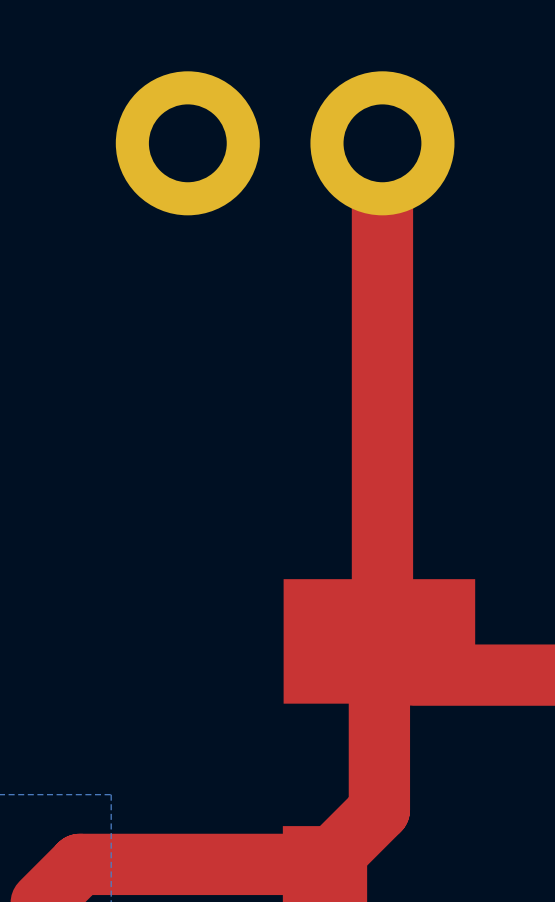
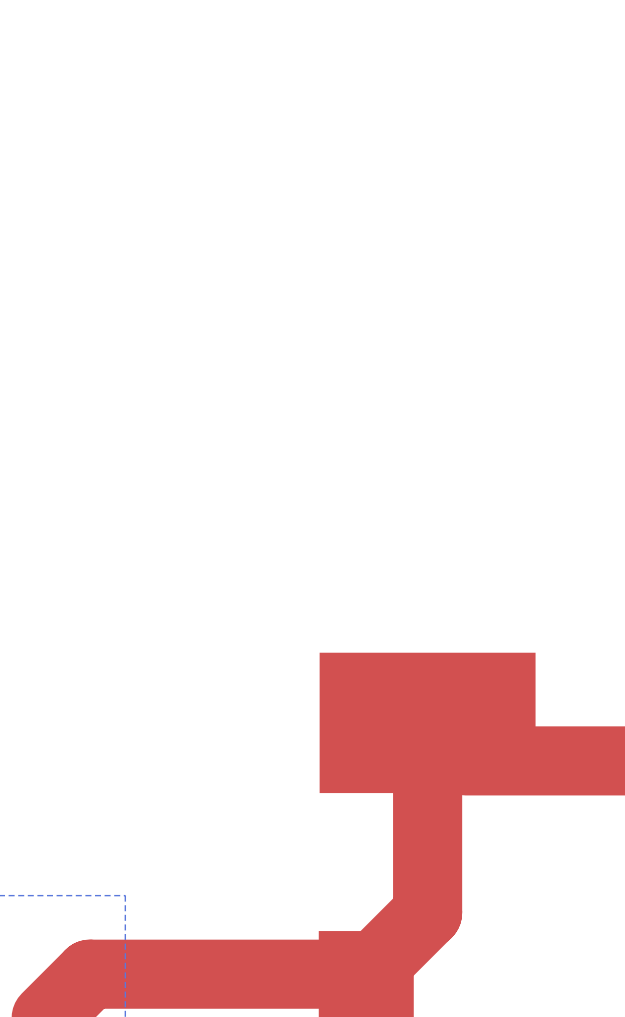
part: (285, 143) -> none
top track: (382, 143) (382, 641) (379, 641) -> none

